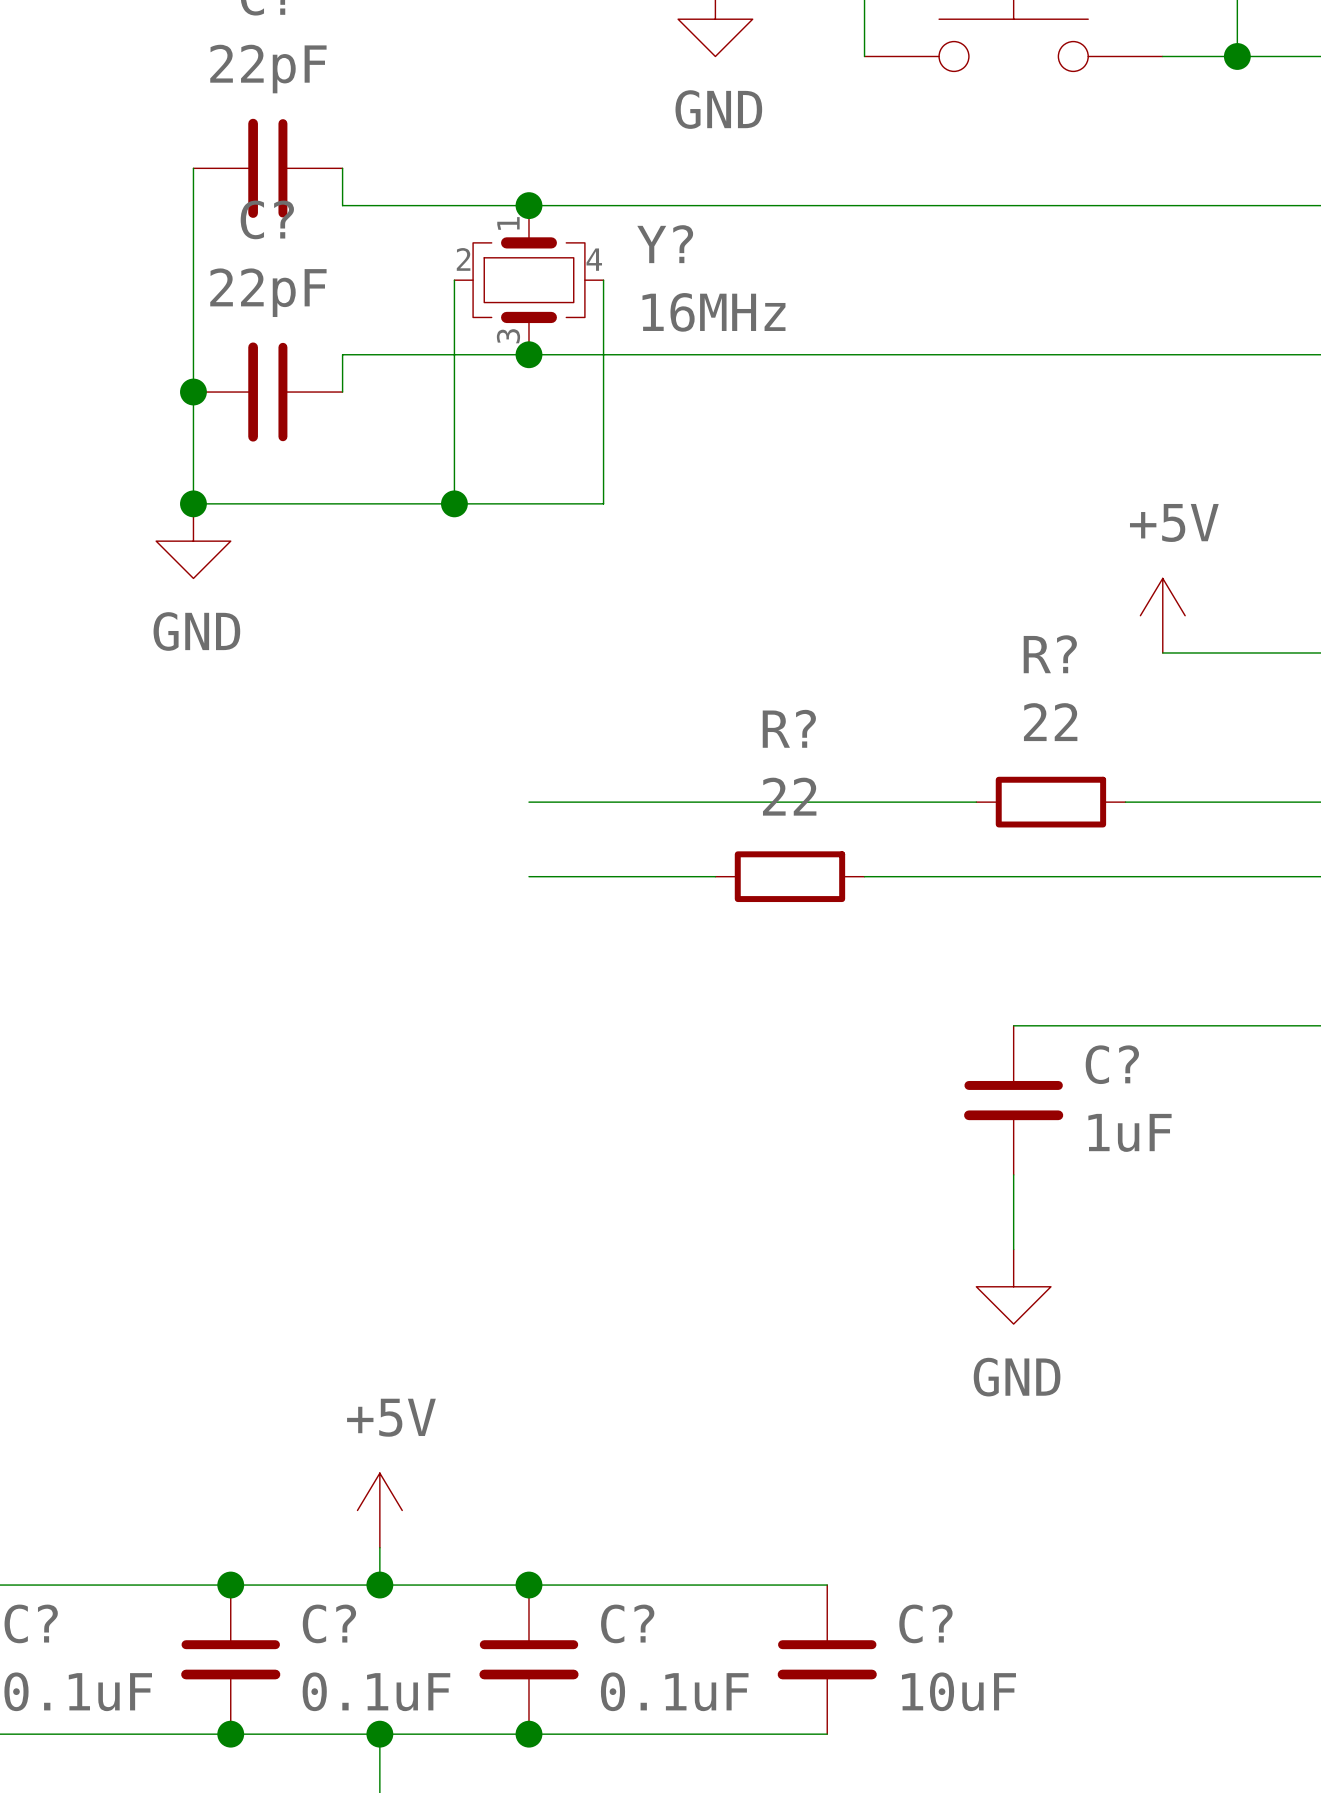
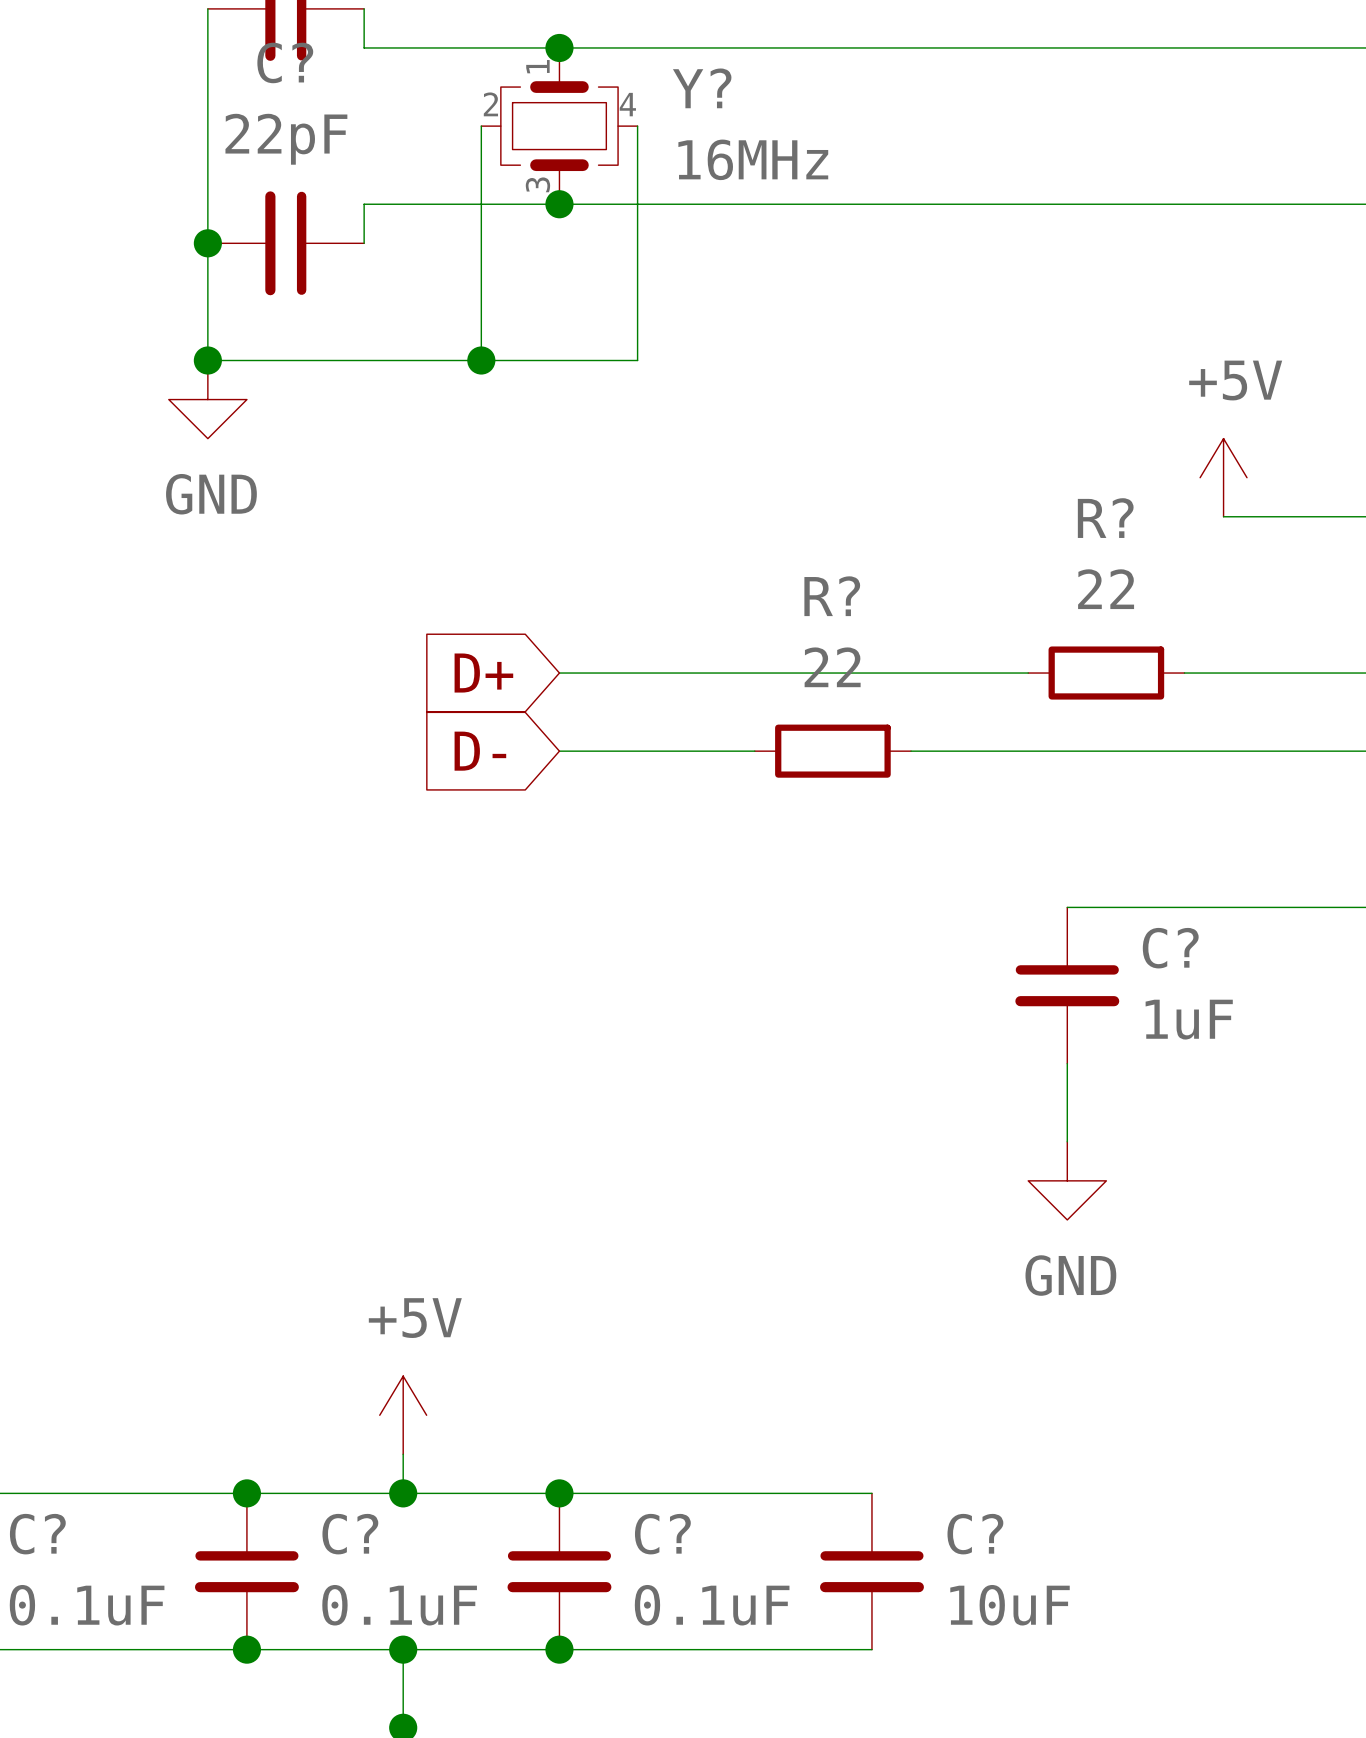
global label: none -> D+ (483, 673)
global label: none -> D- (480, 751)

